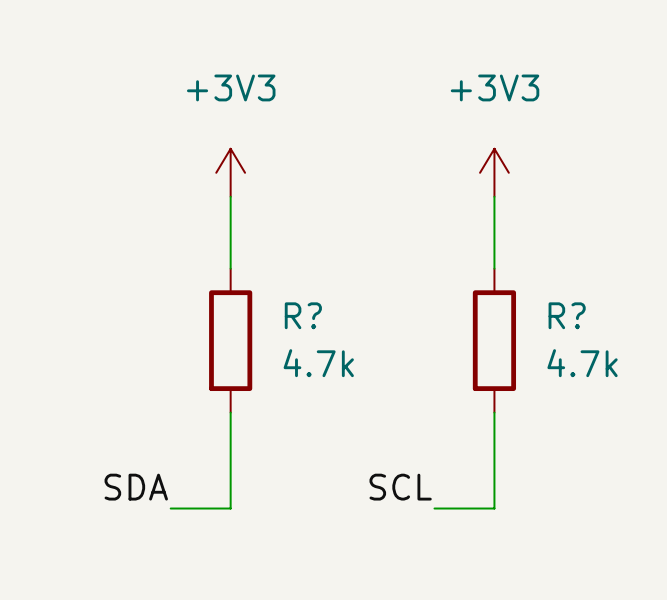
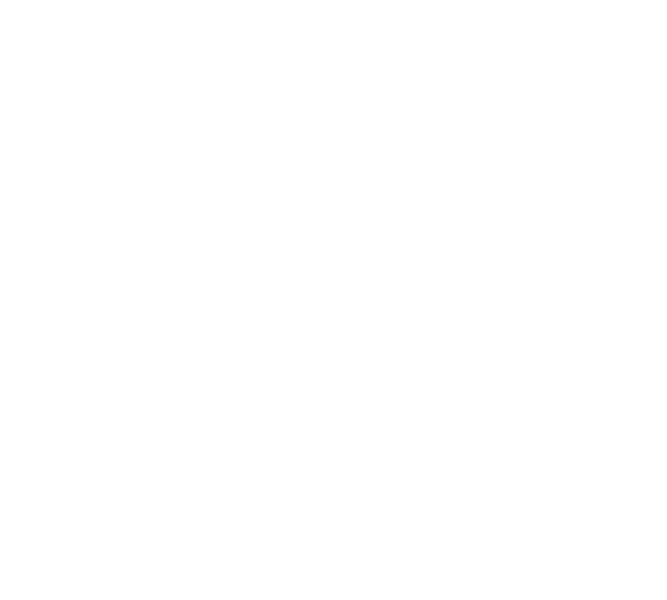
power symbol: +3V3 (230, 172) -> none
power symbol: +3V3 (494, 172) -> none
wire: (230, 196) (230, 268) -> none
wire: (494, 196) (494, 268) -> none
R?: 4.7k (230, 340) -> none
R?: 4.7k (494, 340) -> none
wire: (230, 412) (230, 508) (170, 508) -> none
wire: (494, 412) (494, 508) (434, 508) -> none
label: SDA (136, 487) -> none
label: SCL (400, 487) -> none

